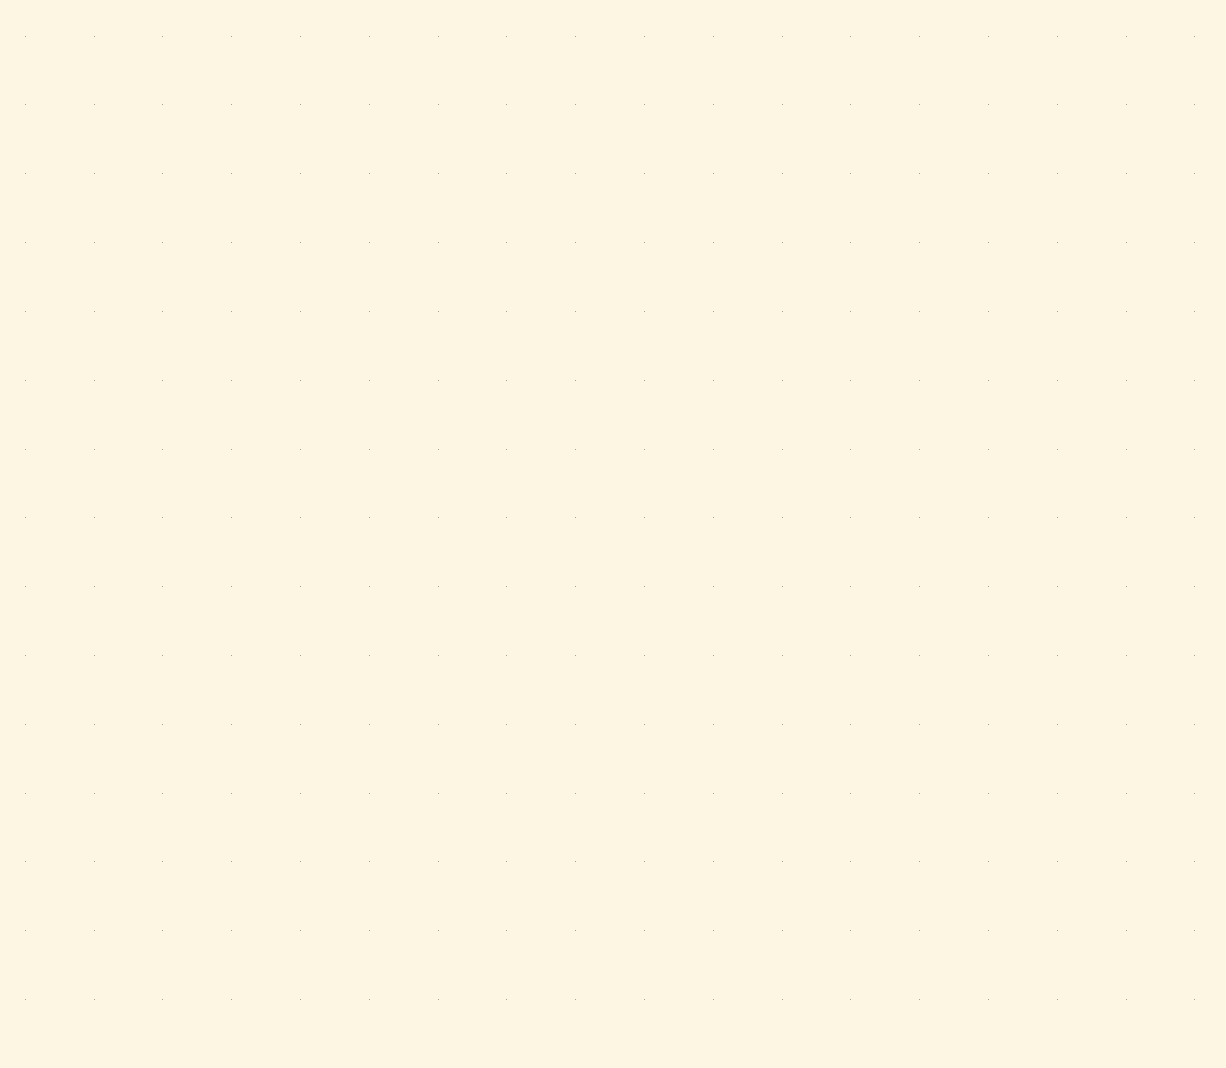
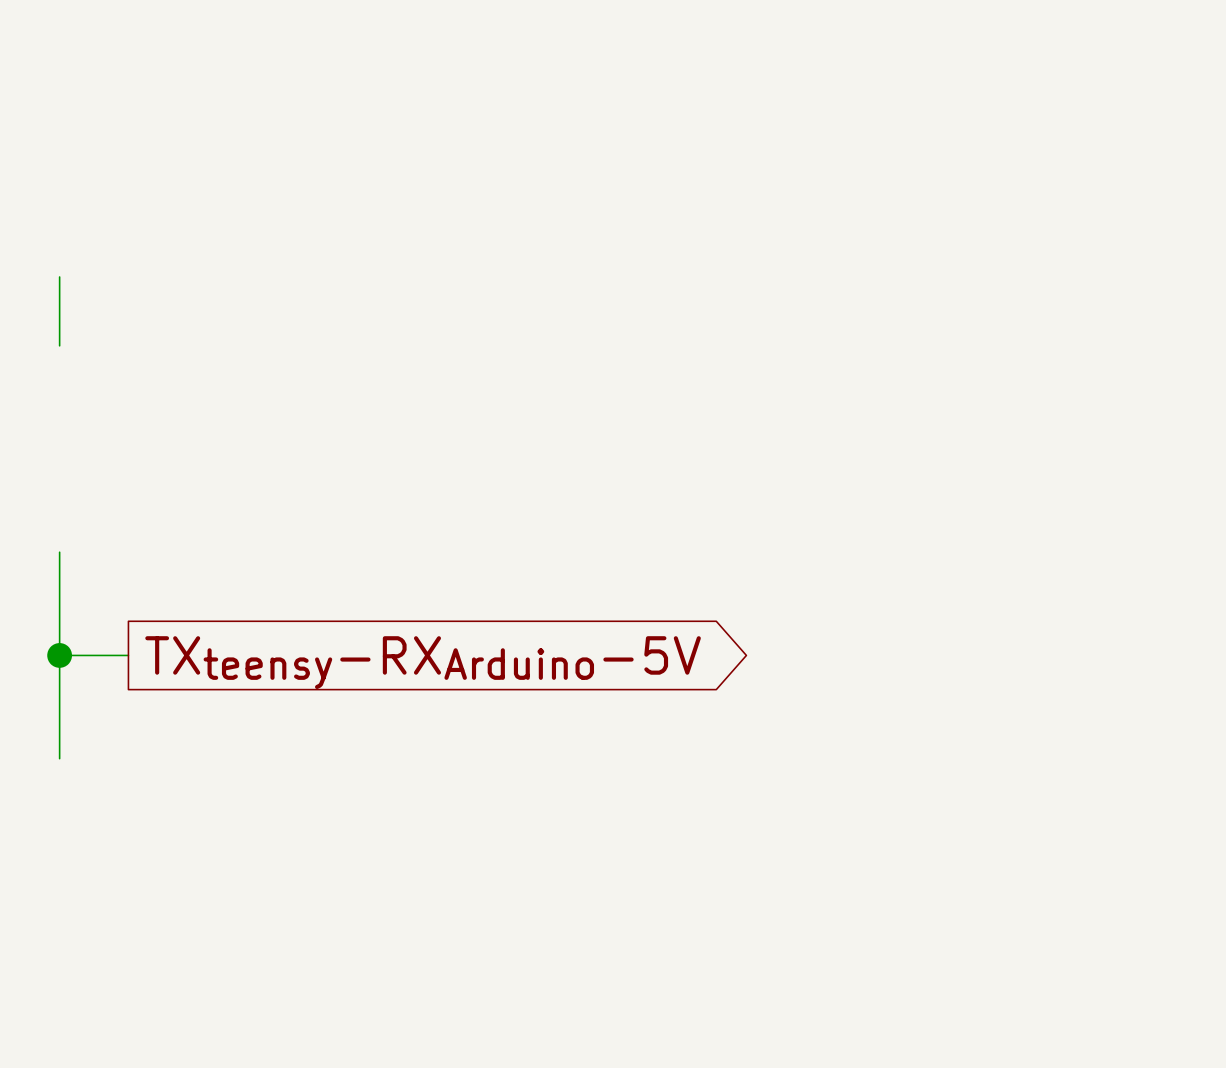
wire: none -> (59, 277) (59, 345)
wire: none -> (59, 552) (59, 758)
wire: none -> (59, 655) (128, 655)
junction: none -> (59, 655)
global label: none -> TXteensy-RXArduino-5V (423, 662)

